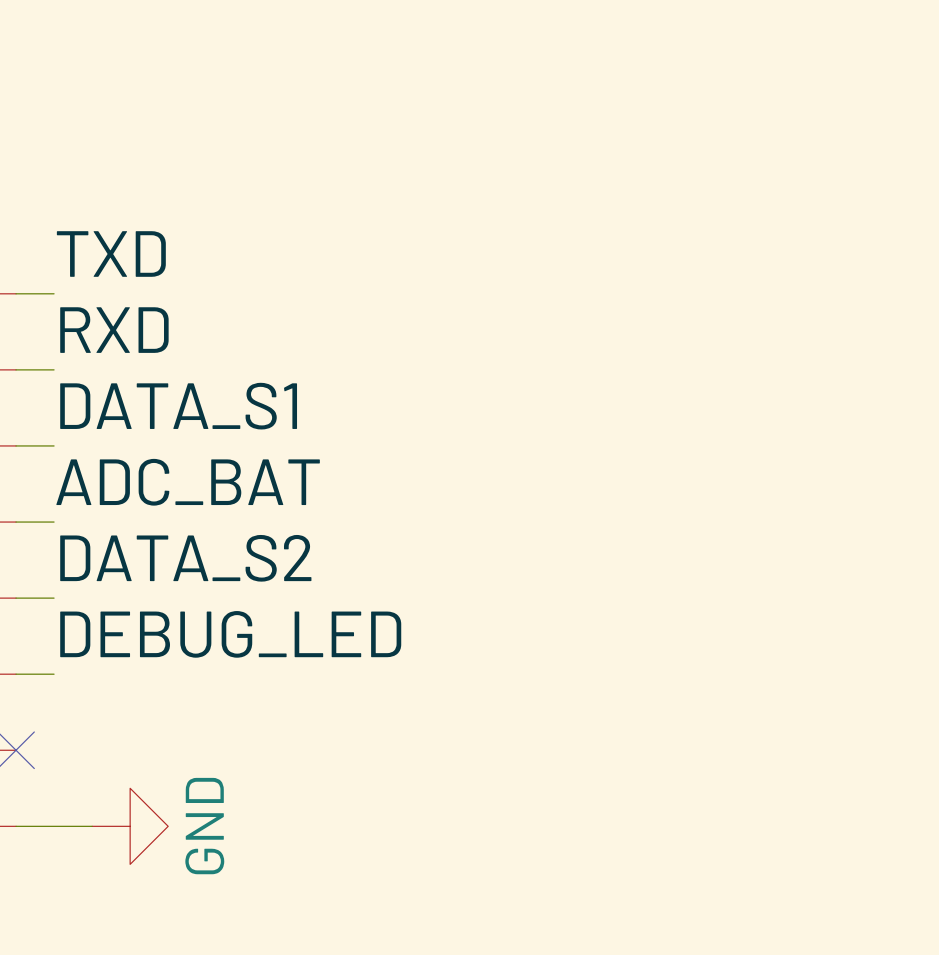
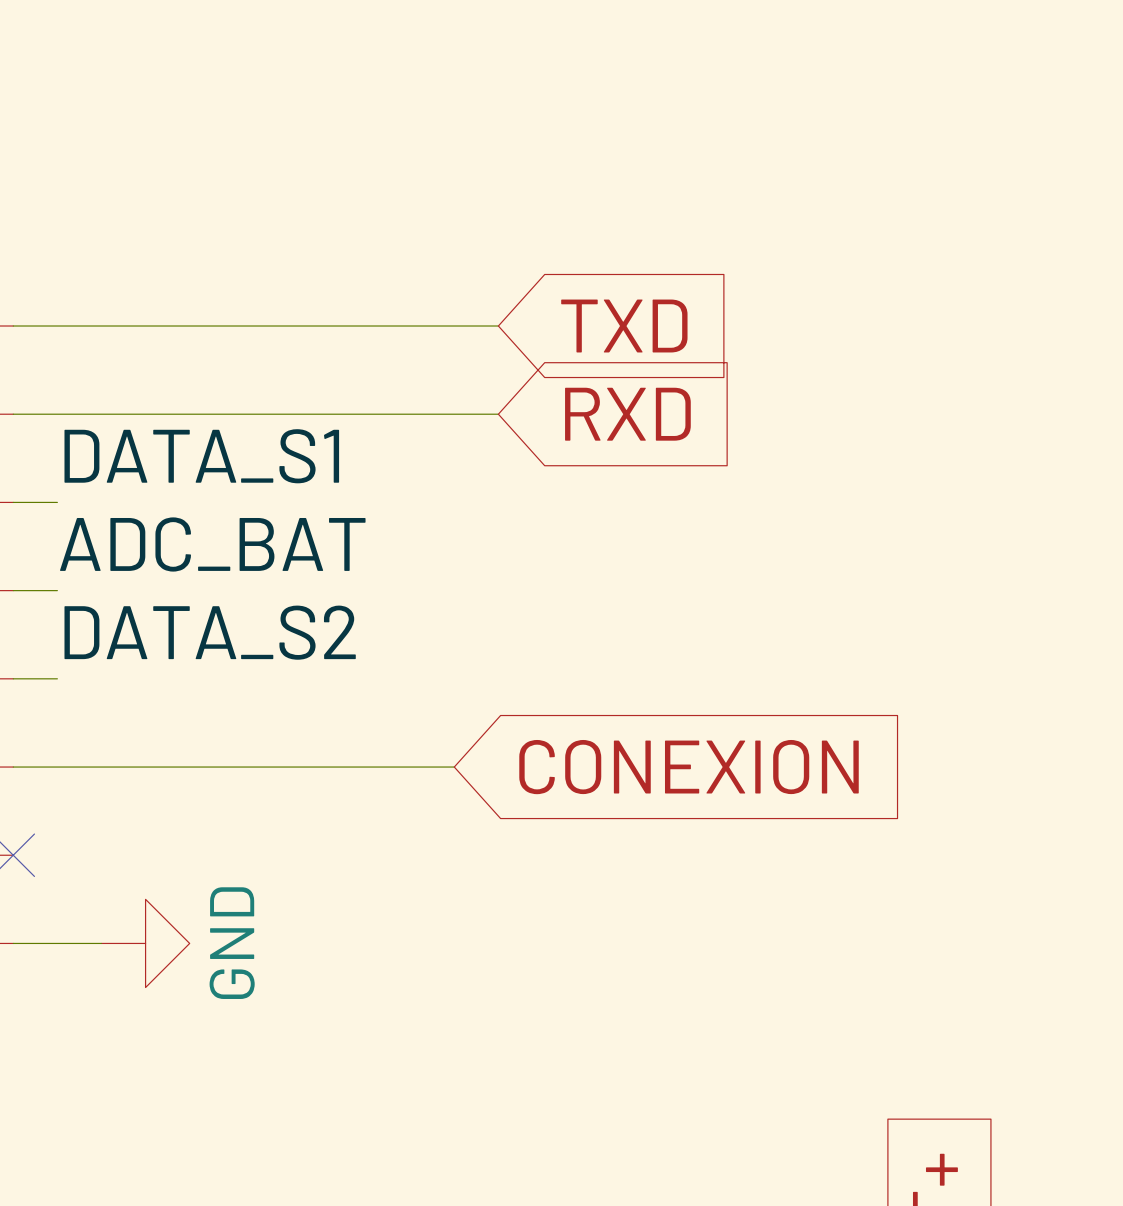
label: TXD (111, 254) -> none
wire: none -> (57, 326) (498, 326)
global label: none -> TXD (624, 326)
label: RXD (114, 330) -> none
wire: none -> (57, 414) (498, 414)
global label: none -> RXD (627, 414)
label: DEBUG_LED (230, 634) -> none
wire: none -> (57, 767) (454, 767)
global label: none -> CONEXION (689, 767)

